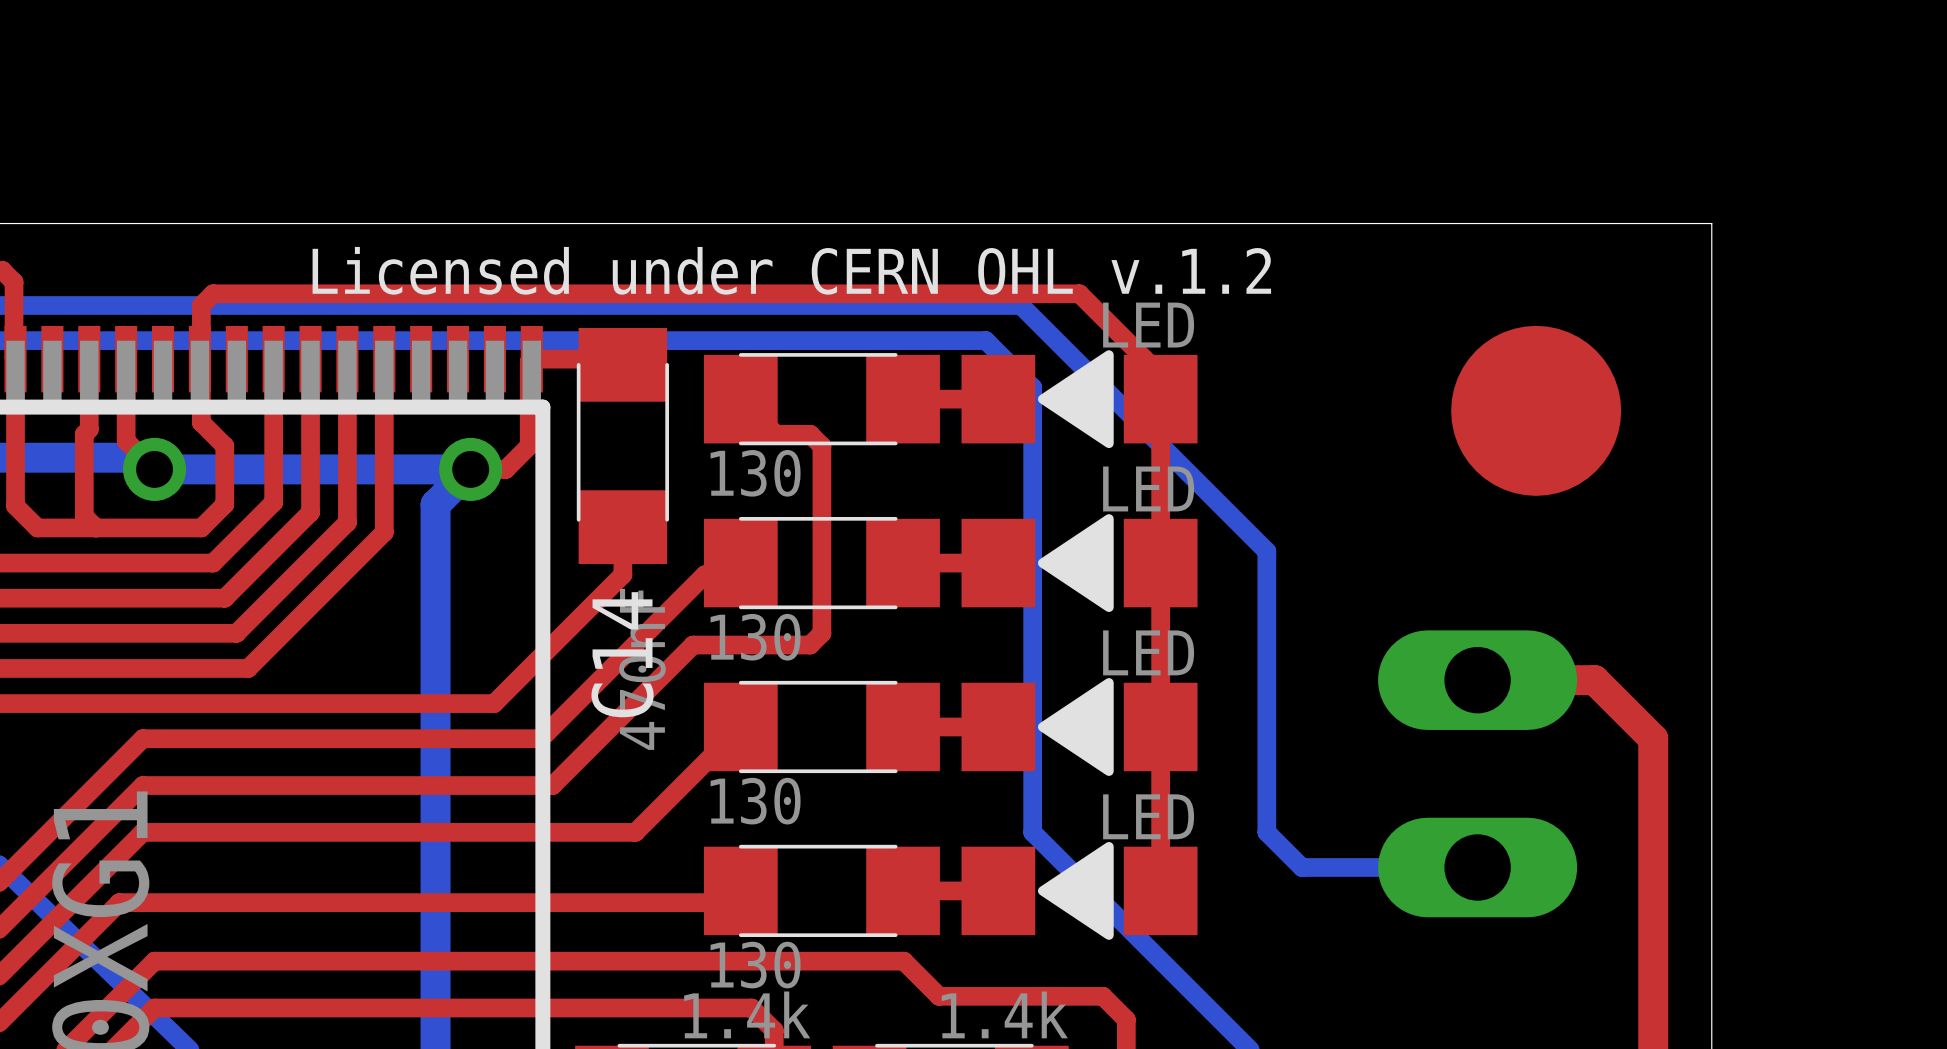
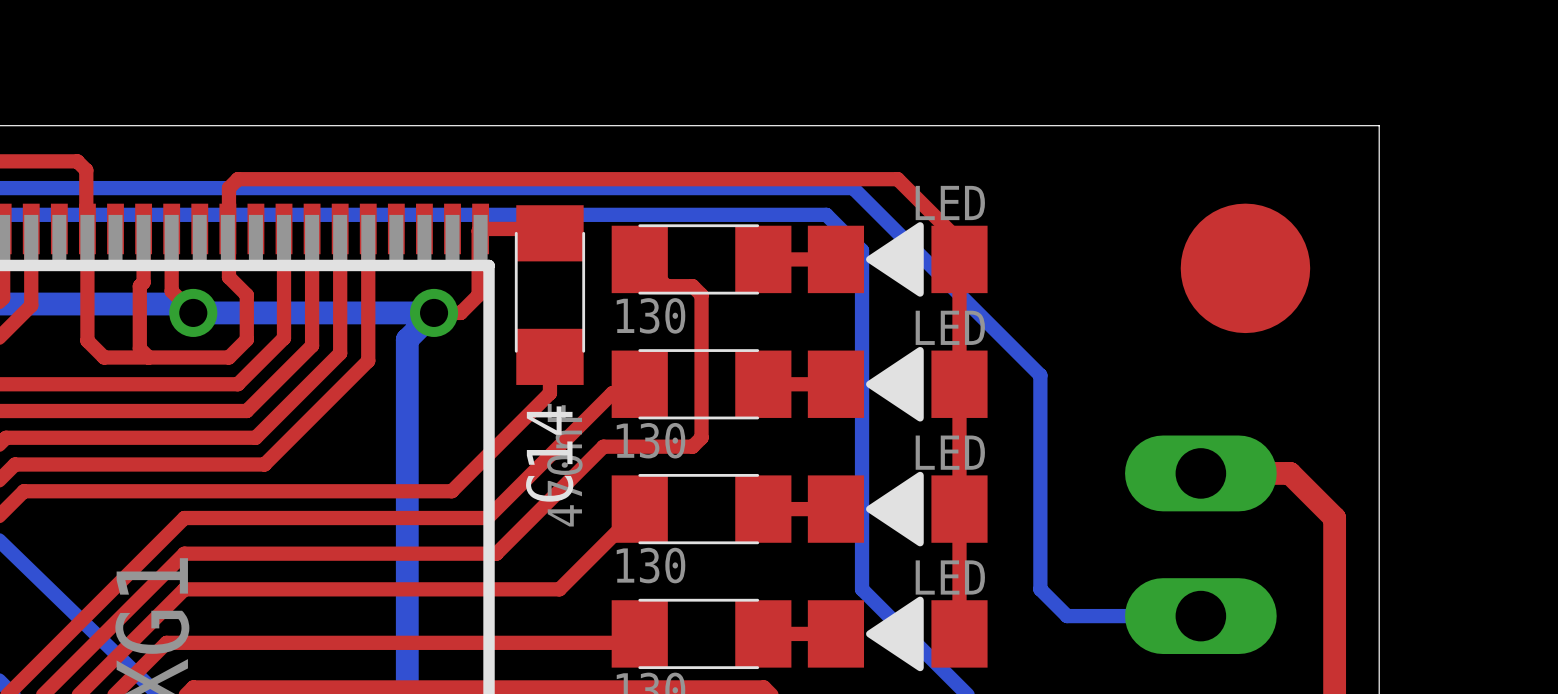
text: Licensed under CERN OHL v.1.2 (791, 270) -> none

